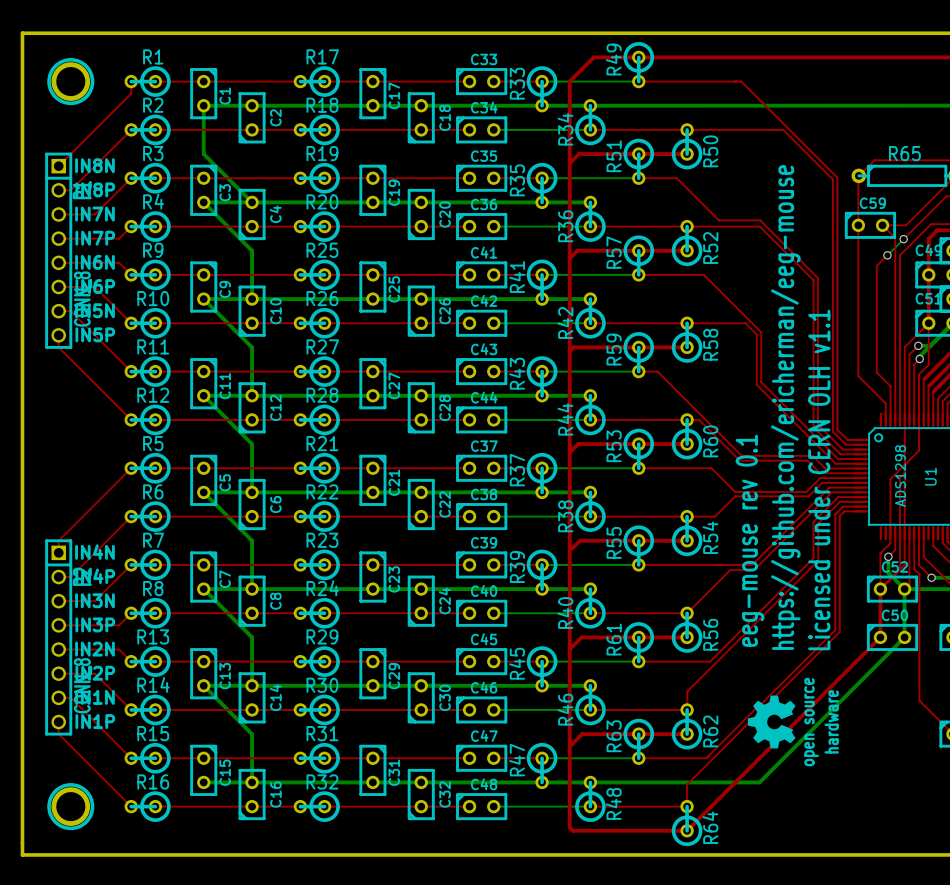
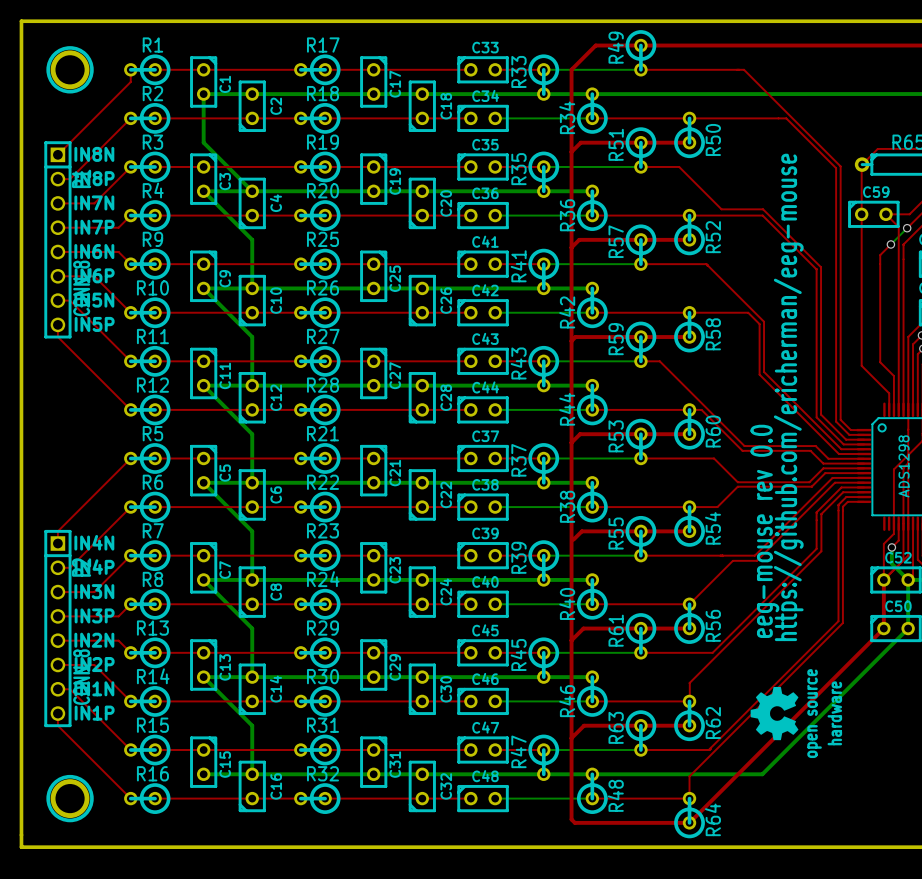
text: Licensed under CERN OLH v1.1 (819, 480) -> none
text: eeg-mouse rev 0.1 (750, 540) -> eeg-mouse rev 0.0 (764, 531)

